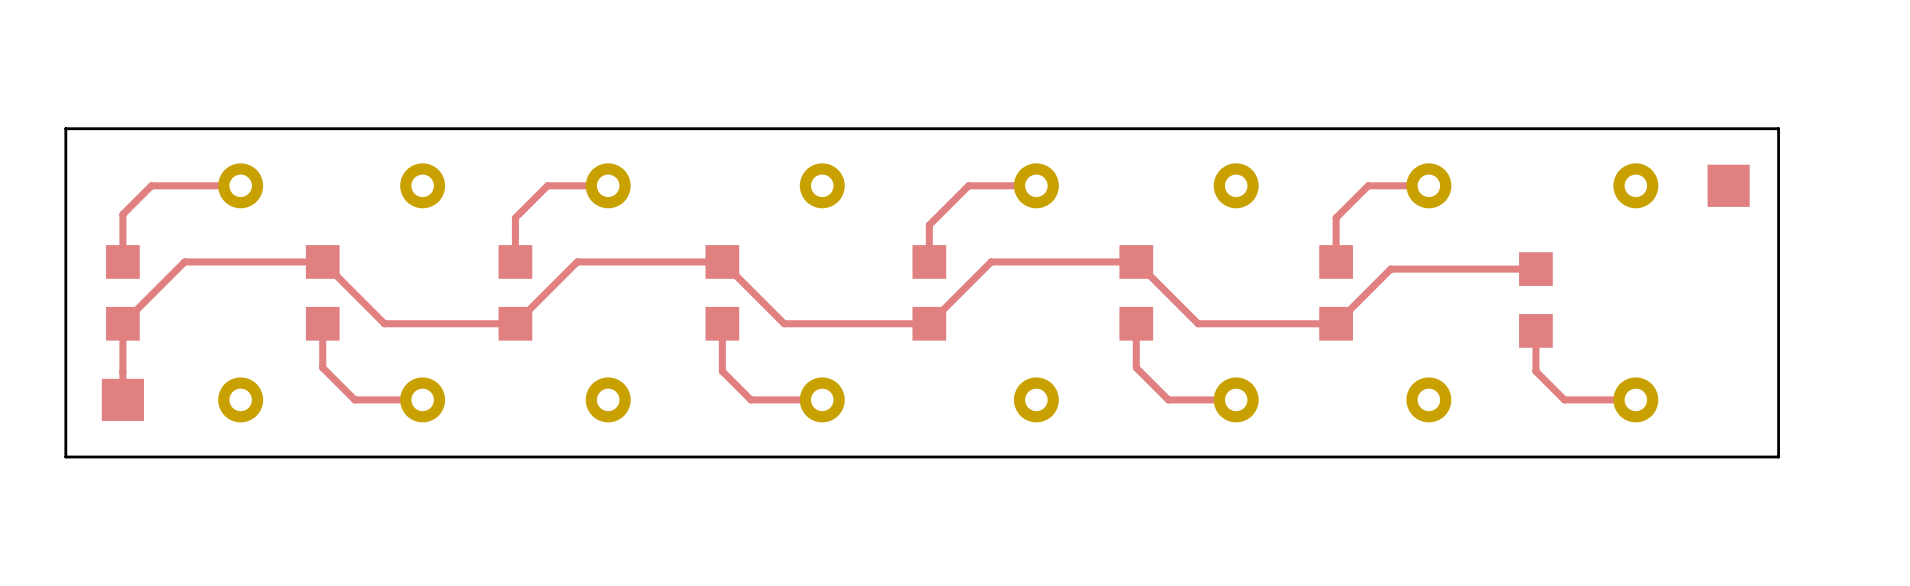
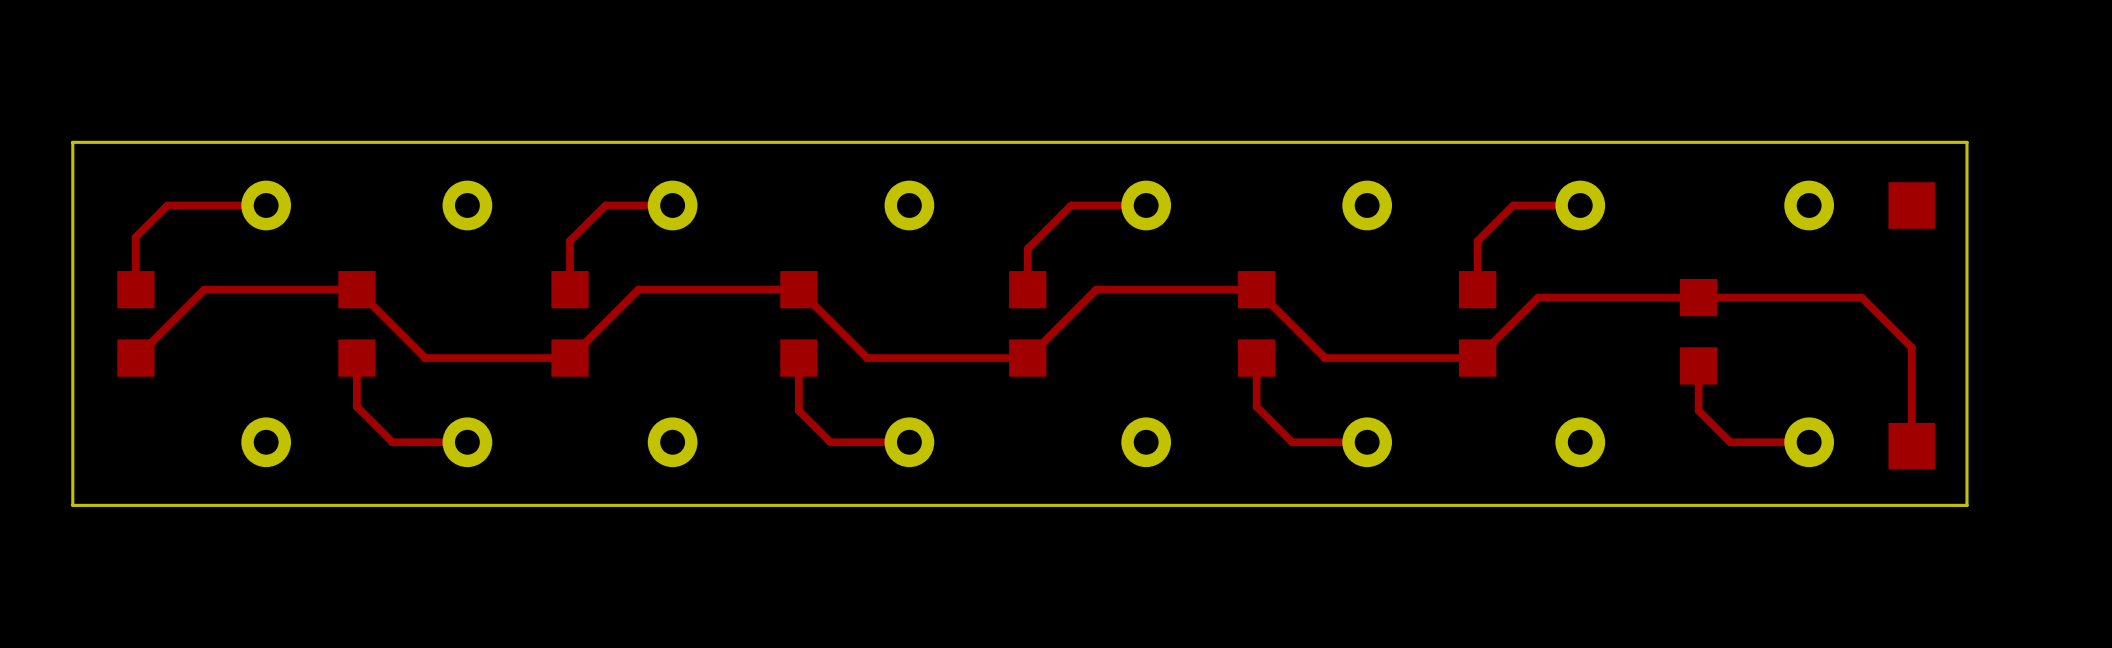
top track: none -> (1698, 297) (1861, 297) (1911, 347) (1911, 446)
top track: (122, 323) (122, 399) -> none
part: (122, 399) -> none
part: none -> (1911, 446)

